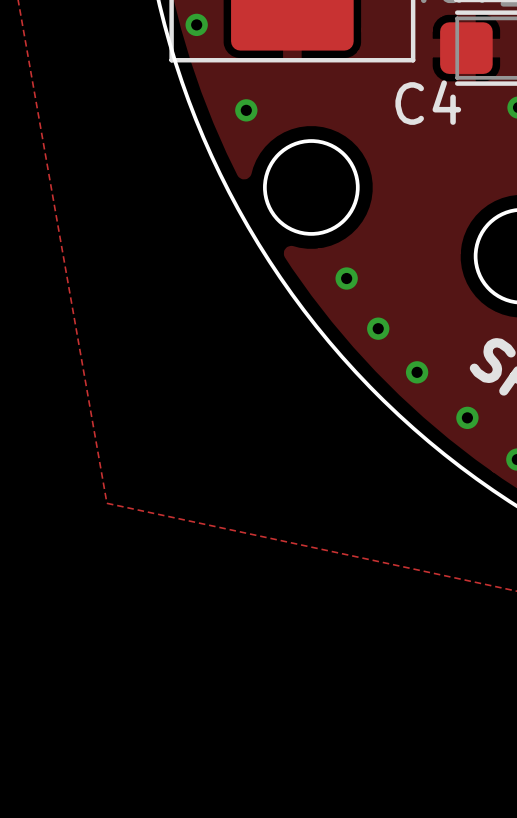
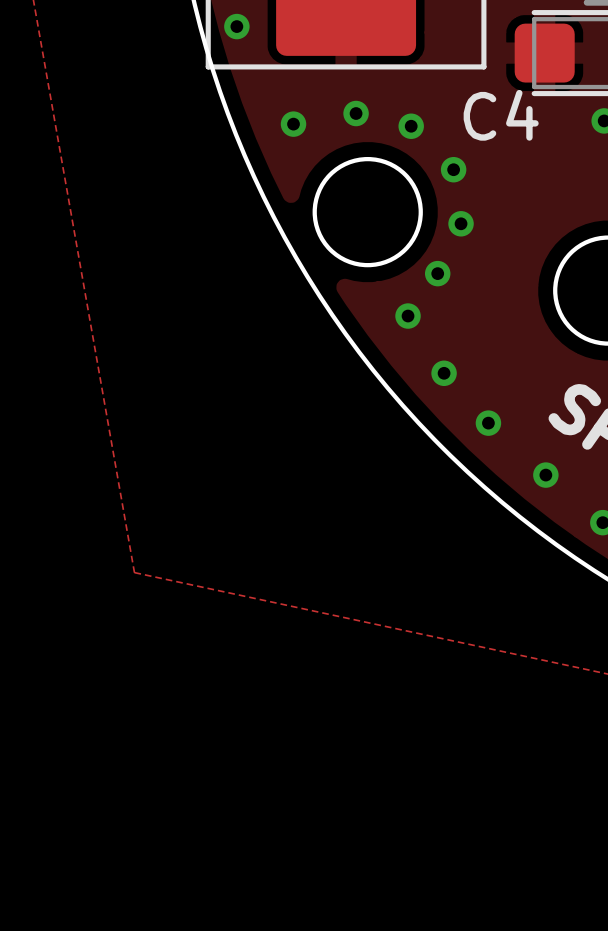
via: none -> (356, 113)
via: none -> (411, 126)
via: none -> (453, 169)
via: none -> (461, 223)
via: none -> (437, 273)

